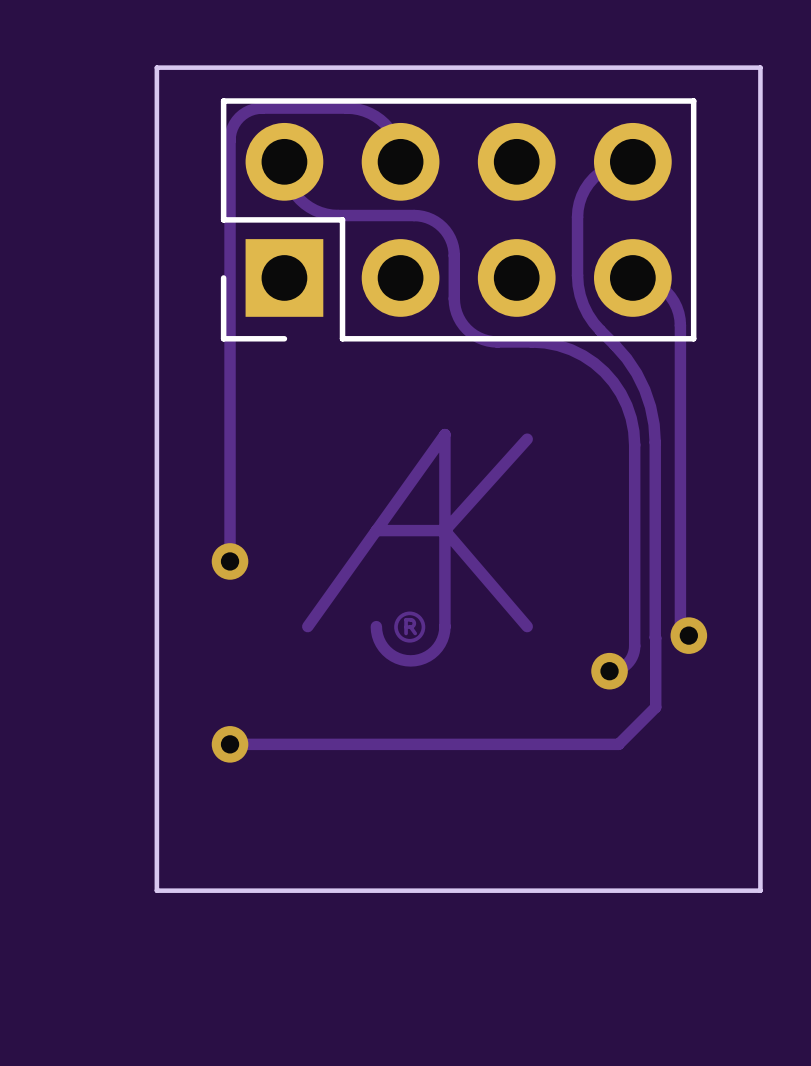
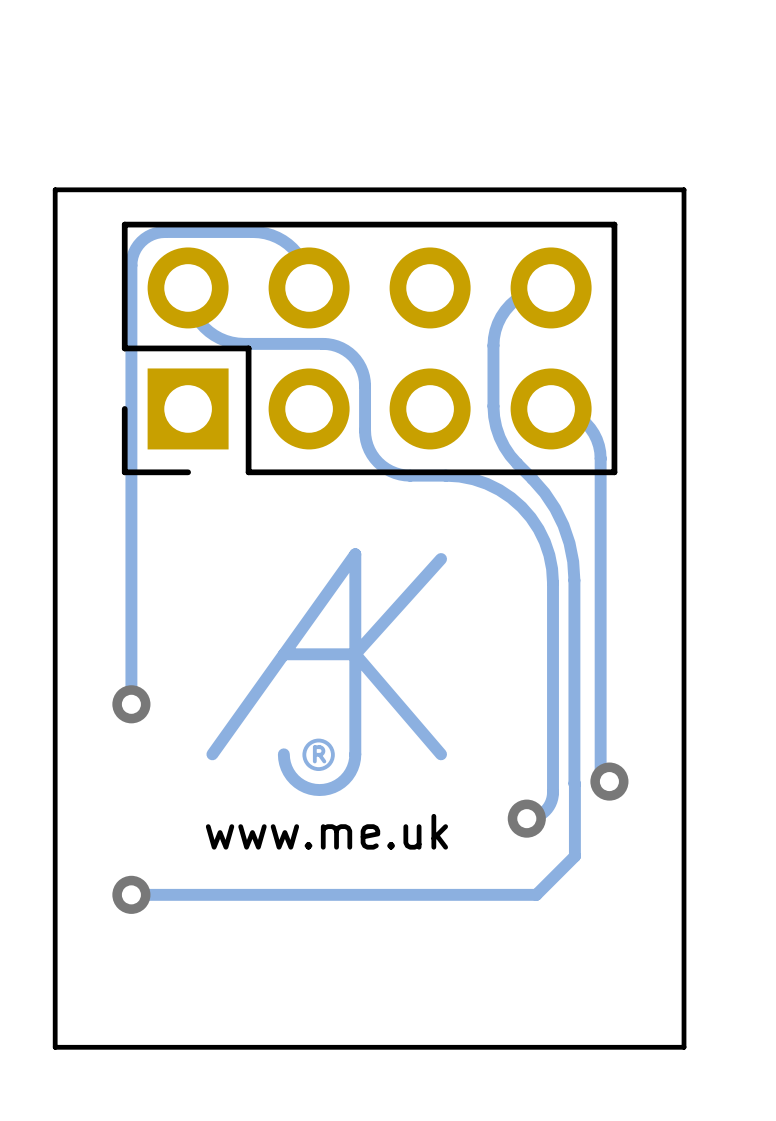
drawing shape: [302, 428, 533, 667] -> [205, 548, 449, 850]

